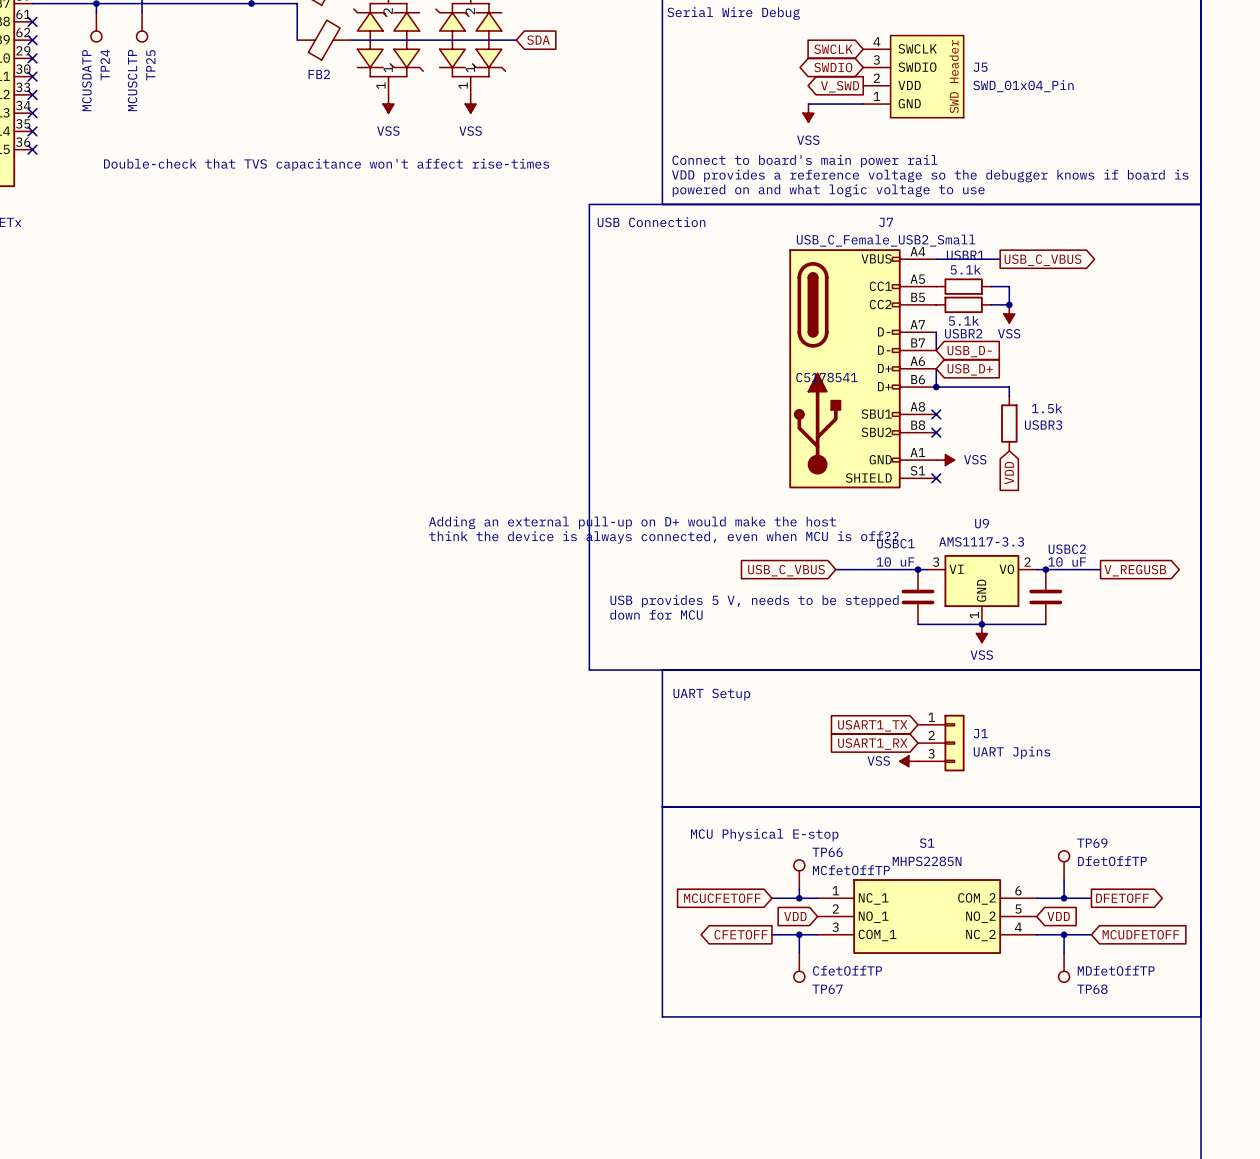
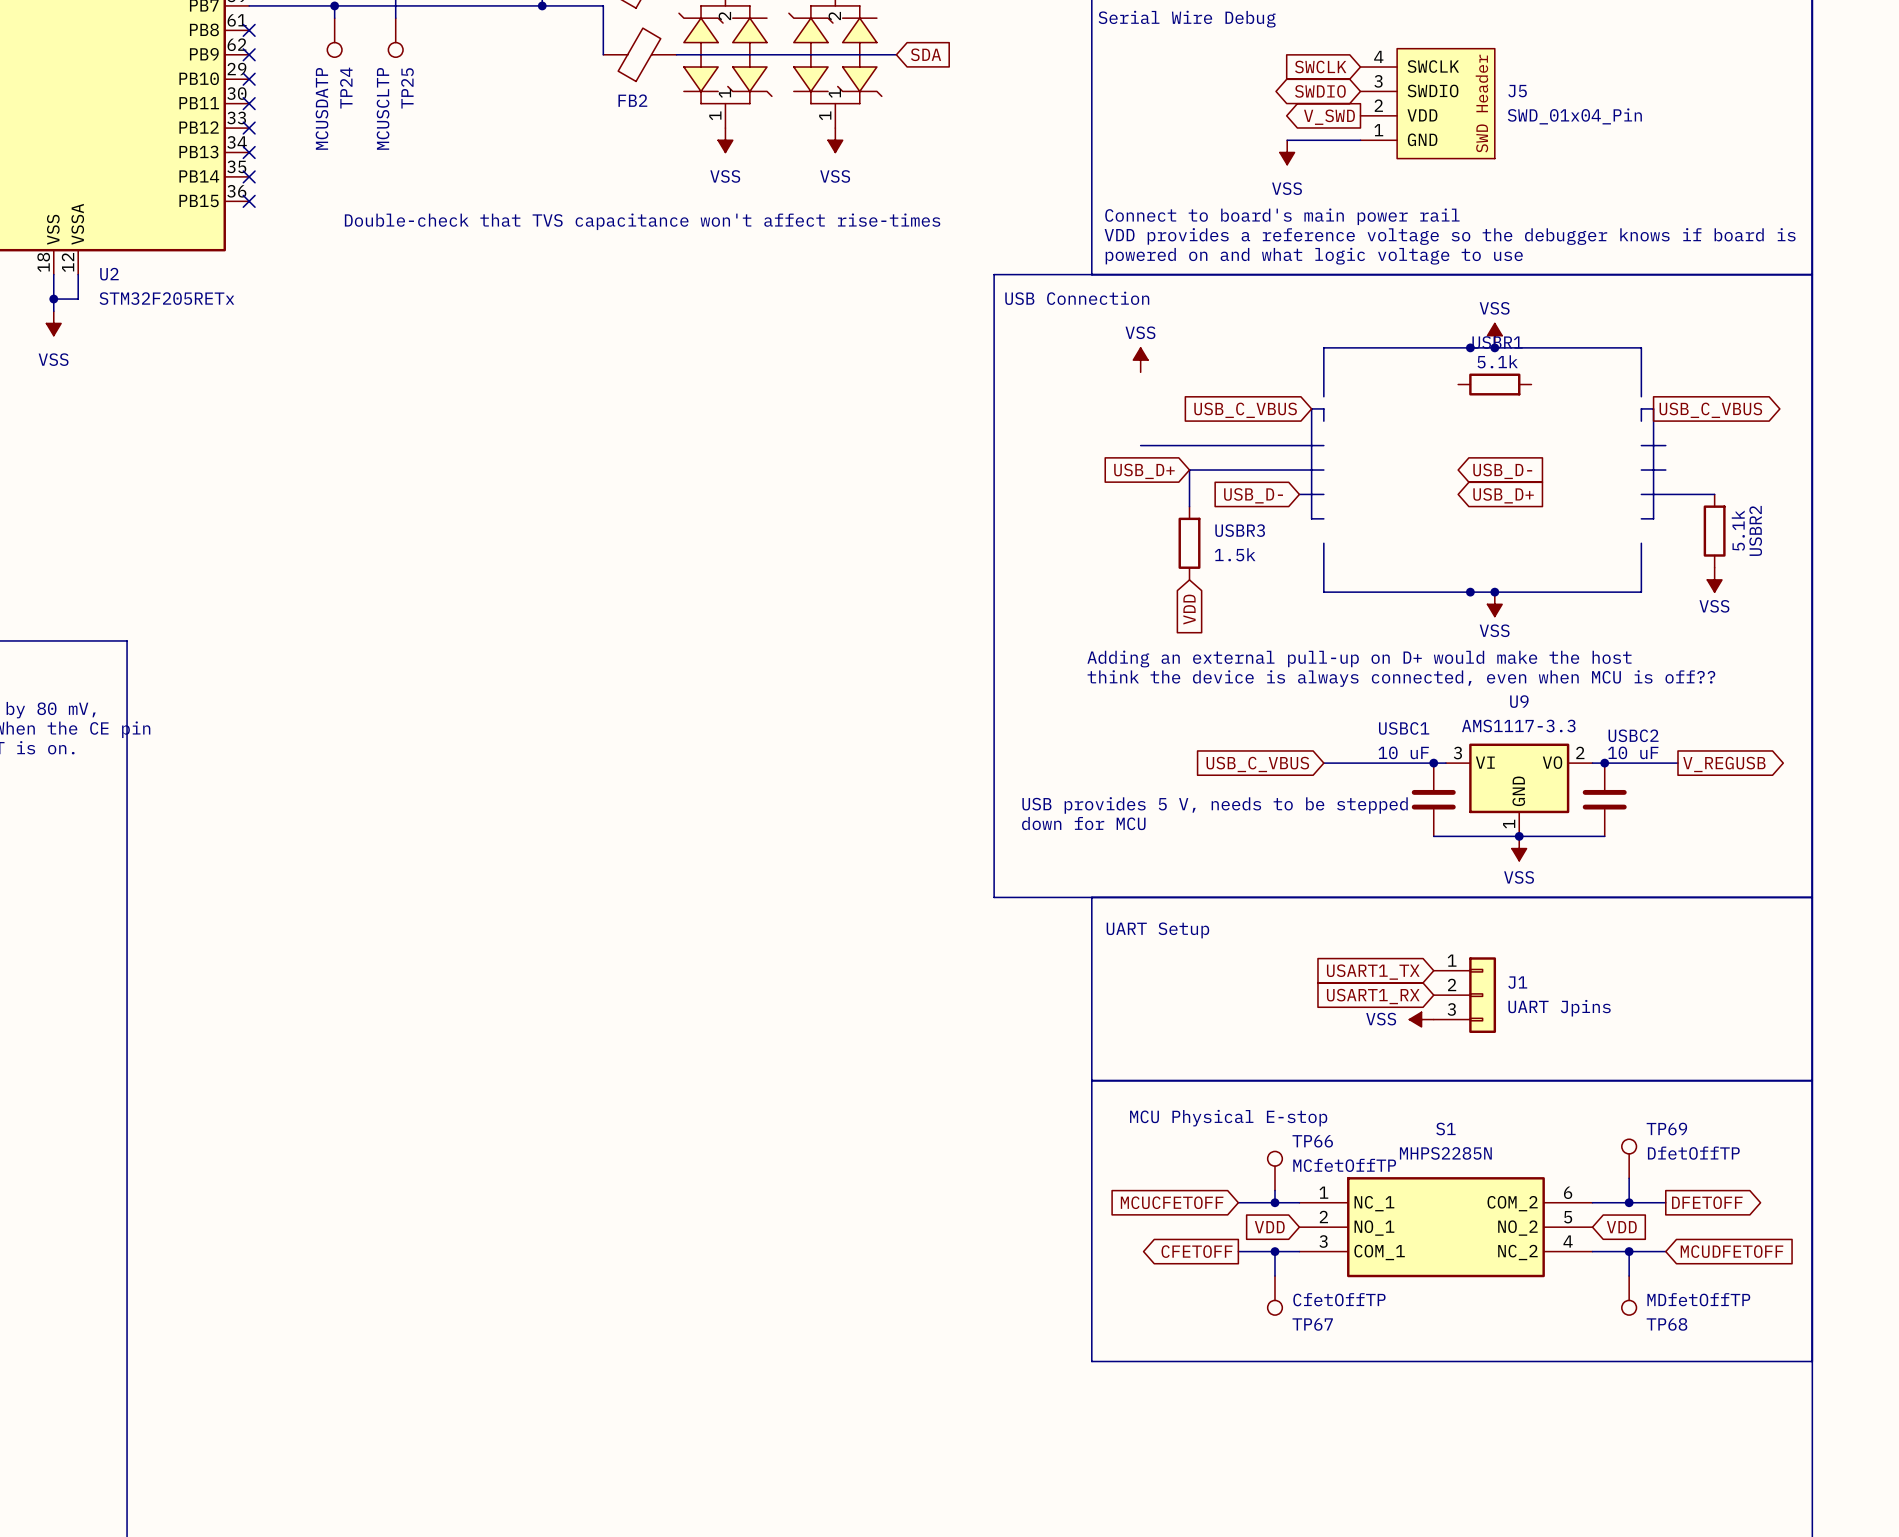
power symbol: none -> VSS (1494, 335)
junction: none -> (1470, 347)
junction: none -> (1494, 347)
wire: none -> (1543, 347) (1641, 347) (1641, 396)
global label: USB_C_VBUS (1042, 260) -> none
power symbol: none -> VSS (1140, 360)
wire: (991, 286) (1009, 286) (1009, 304) (991, 304) -> none
USBR2 rotation: 0° (963, 304) -> 90° clockwise (1714, 531)
USBR2 position: (963, 304) -> (1714, 531)
junction: (1009, 304) -> none
global label: none -> USB_C_VBUS (1245, 410)
global label: none -> USB_C_VBUS (1710, 410)
power symbol: VSS (1009, 314) -> none
wire: none -> (1641, 421) (1641, 408) (1653, 408) (1653, 518) (1641, 518)
USBR2 value position: 5.1k (963, 320) -> 5.1k (1738, 530)
wire: none -> (1140, 445) (1323, 445)
wire: (936, 332) (936, 350) -> none
wire: none -> (1641, 445) (1665, 445)
USBR2 name position: USBR2 (963, 333) -> USBR2 (1755, 530)
wire: none -> (1323, 470) (1189, 470) (1189, 506)
wire: none -> (1641, 470) (1665, 470)
global label: none -> USB_D+ (1144, 471)
J7: USB_C_Female_USB2_Small (862, 368) -> none
wire: (936, 368) (936, 387) (1009, 387) (1009, 396) -> none
wire: none -> (1641, 494) (1714, 494)
global label: none -> USB_D- (1253, 495)
junction: (936, 387) -> none
wire: none -> (1323, 543) (1323, 592) (1641, 592) (1641, 543)
USBR3 value position: 1.5k (1047, 408) -> 1.5k (1235, 554)
no-connect mark: (936, 414) -> none
USBR3 position: (1009, 423) -> (1189, 543)
USBR3 name position: USBR3 (1043, 425) -> USBR3 (1240, 530)
no-connect mark: (936, 432) -> none
power symbol: none -> VSS (1714, 579)
junction: none -> (1470, 592)
junction: none -> (1494, 592)
global label: none -> VDD (1189, 609)
power symbol rotation: 0° (945, 460) -> 90° clockwise (1494, 604)
power symbol position: VSS (945, 460) -> VSS (1494, 604)
global label: VDD (1009, 473) -> none
no-connect mark: (936, 478) -> none
text: none -> Adding an external pull-up on D+ would make the host (1359, 659)
text: none -> think the device is always connected, even when MCU is off?? (1401, 678)
text: Adding an external pull-up on D+ would make the host (632, 522) -> none
text: think the device is always connected, even when MCU is off?? (663, 537) -> none

